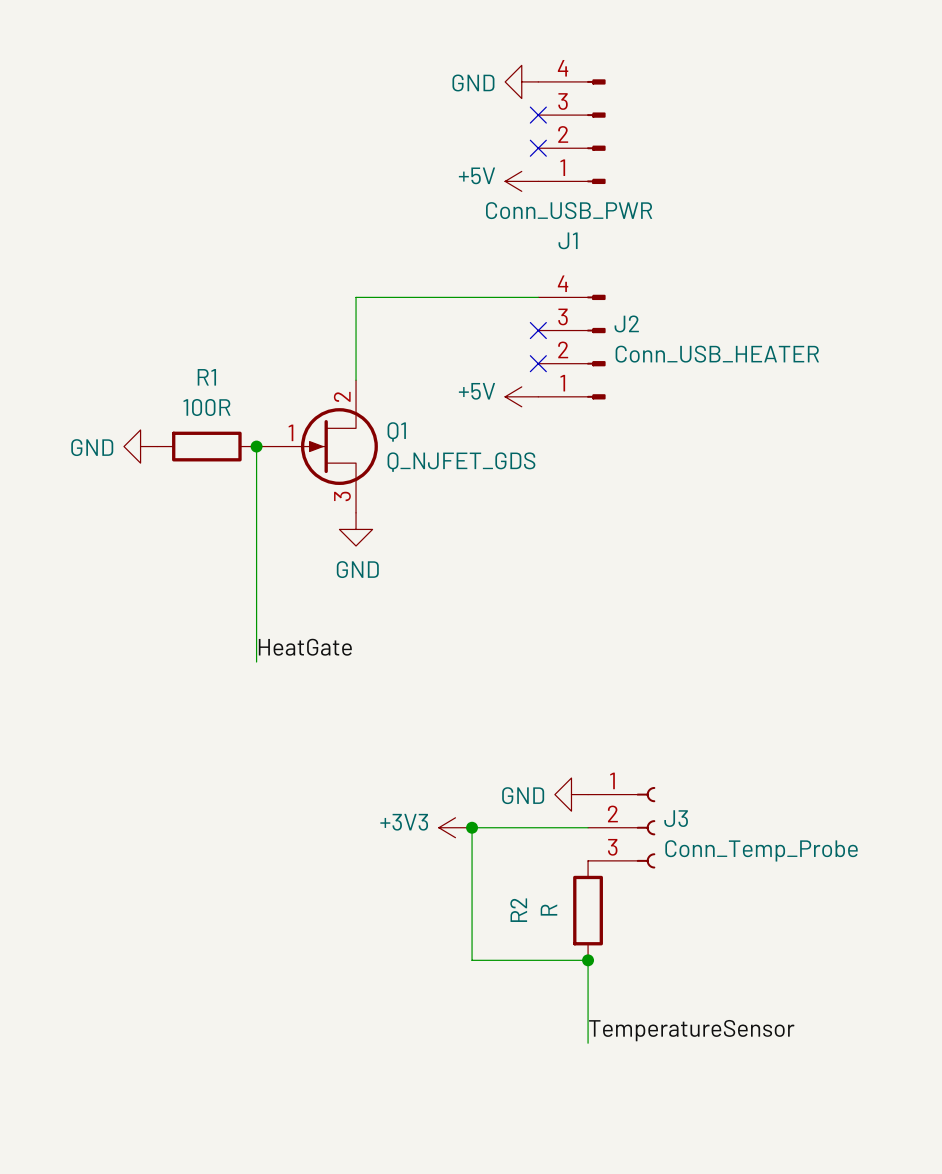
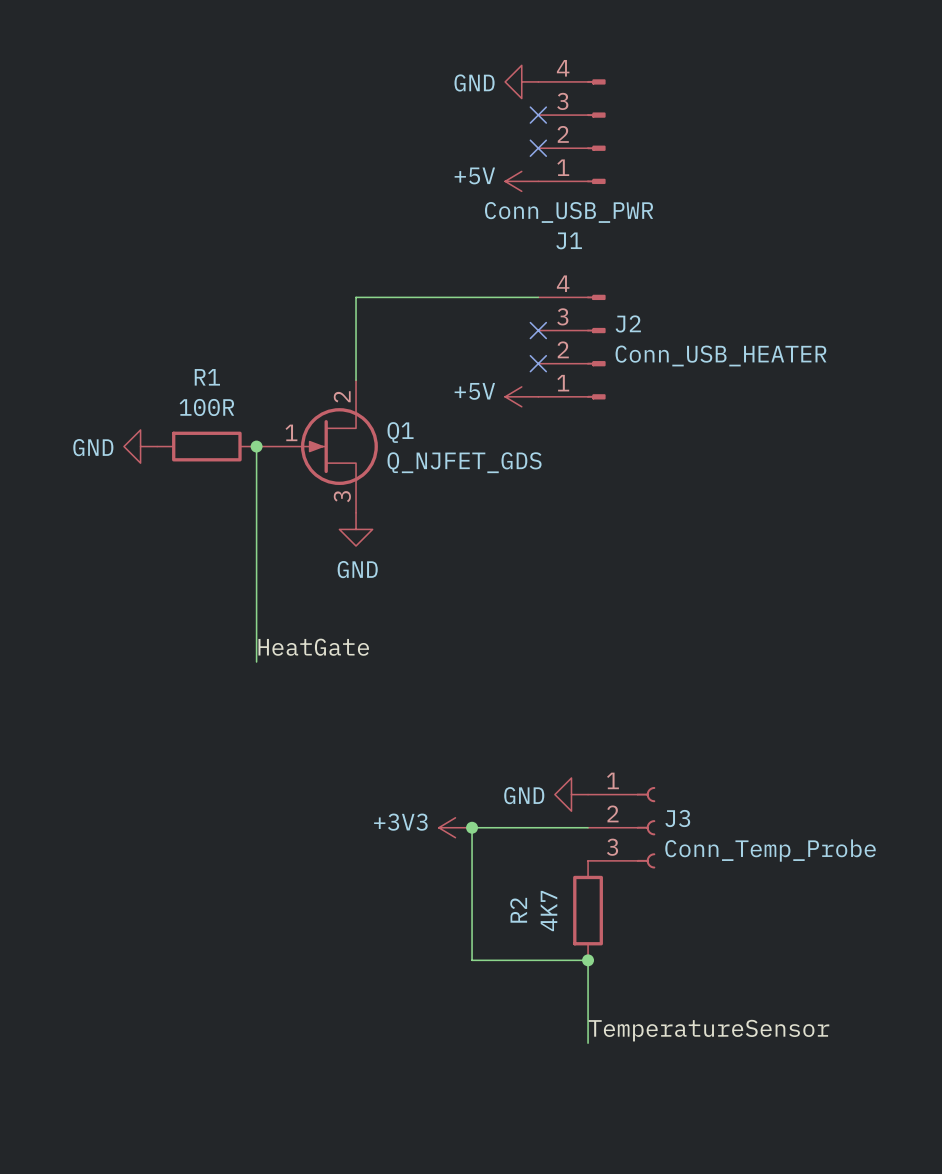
R2 value: R (548, 910) -> 4K7 (548, 911)

